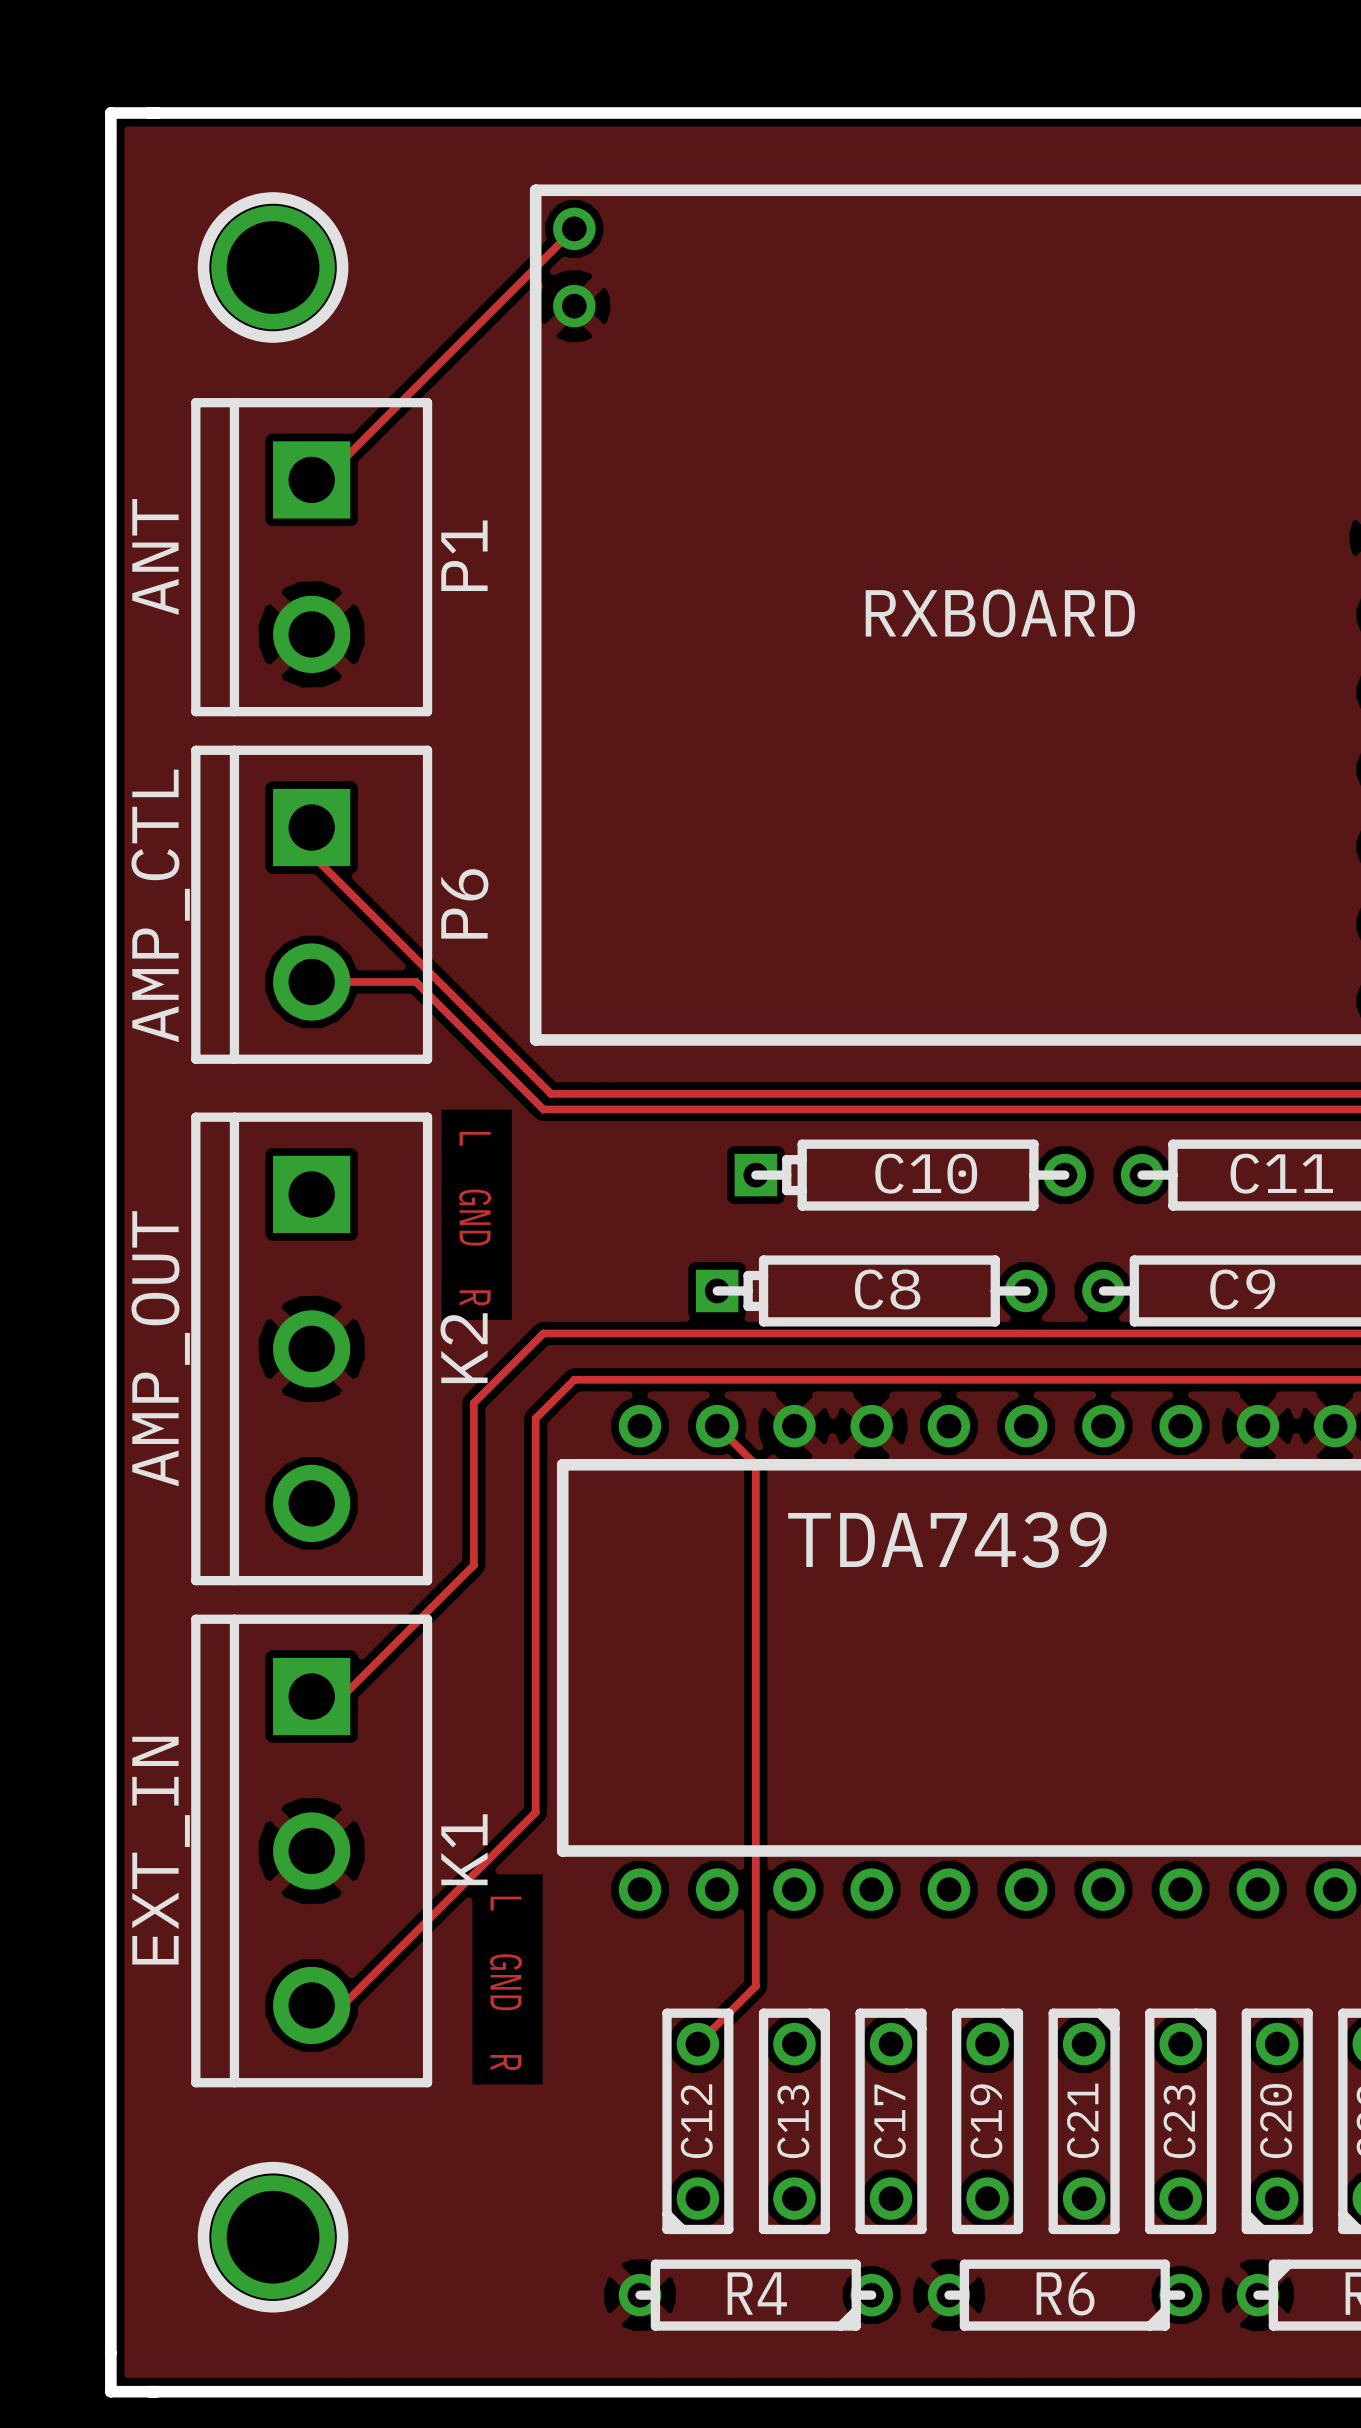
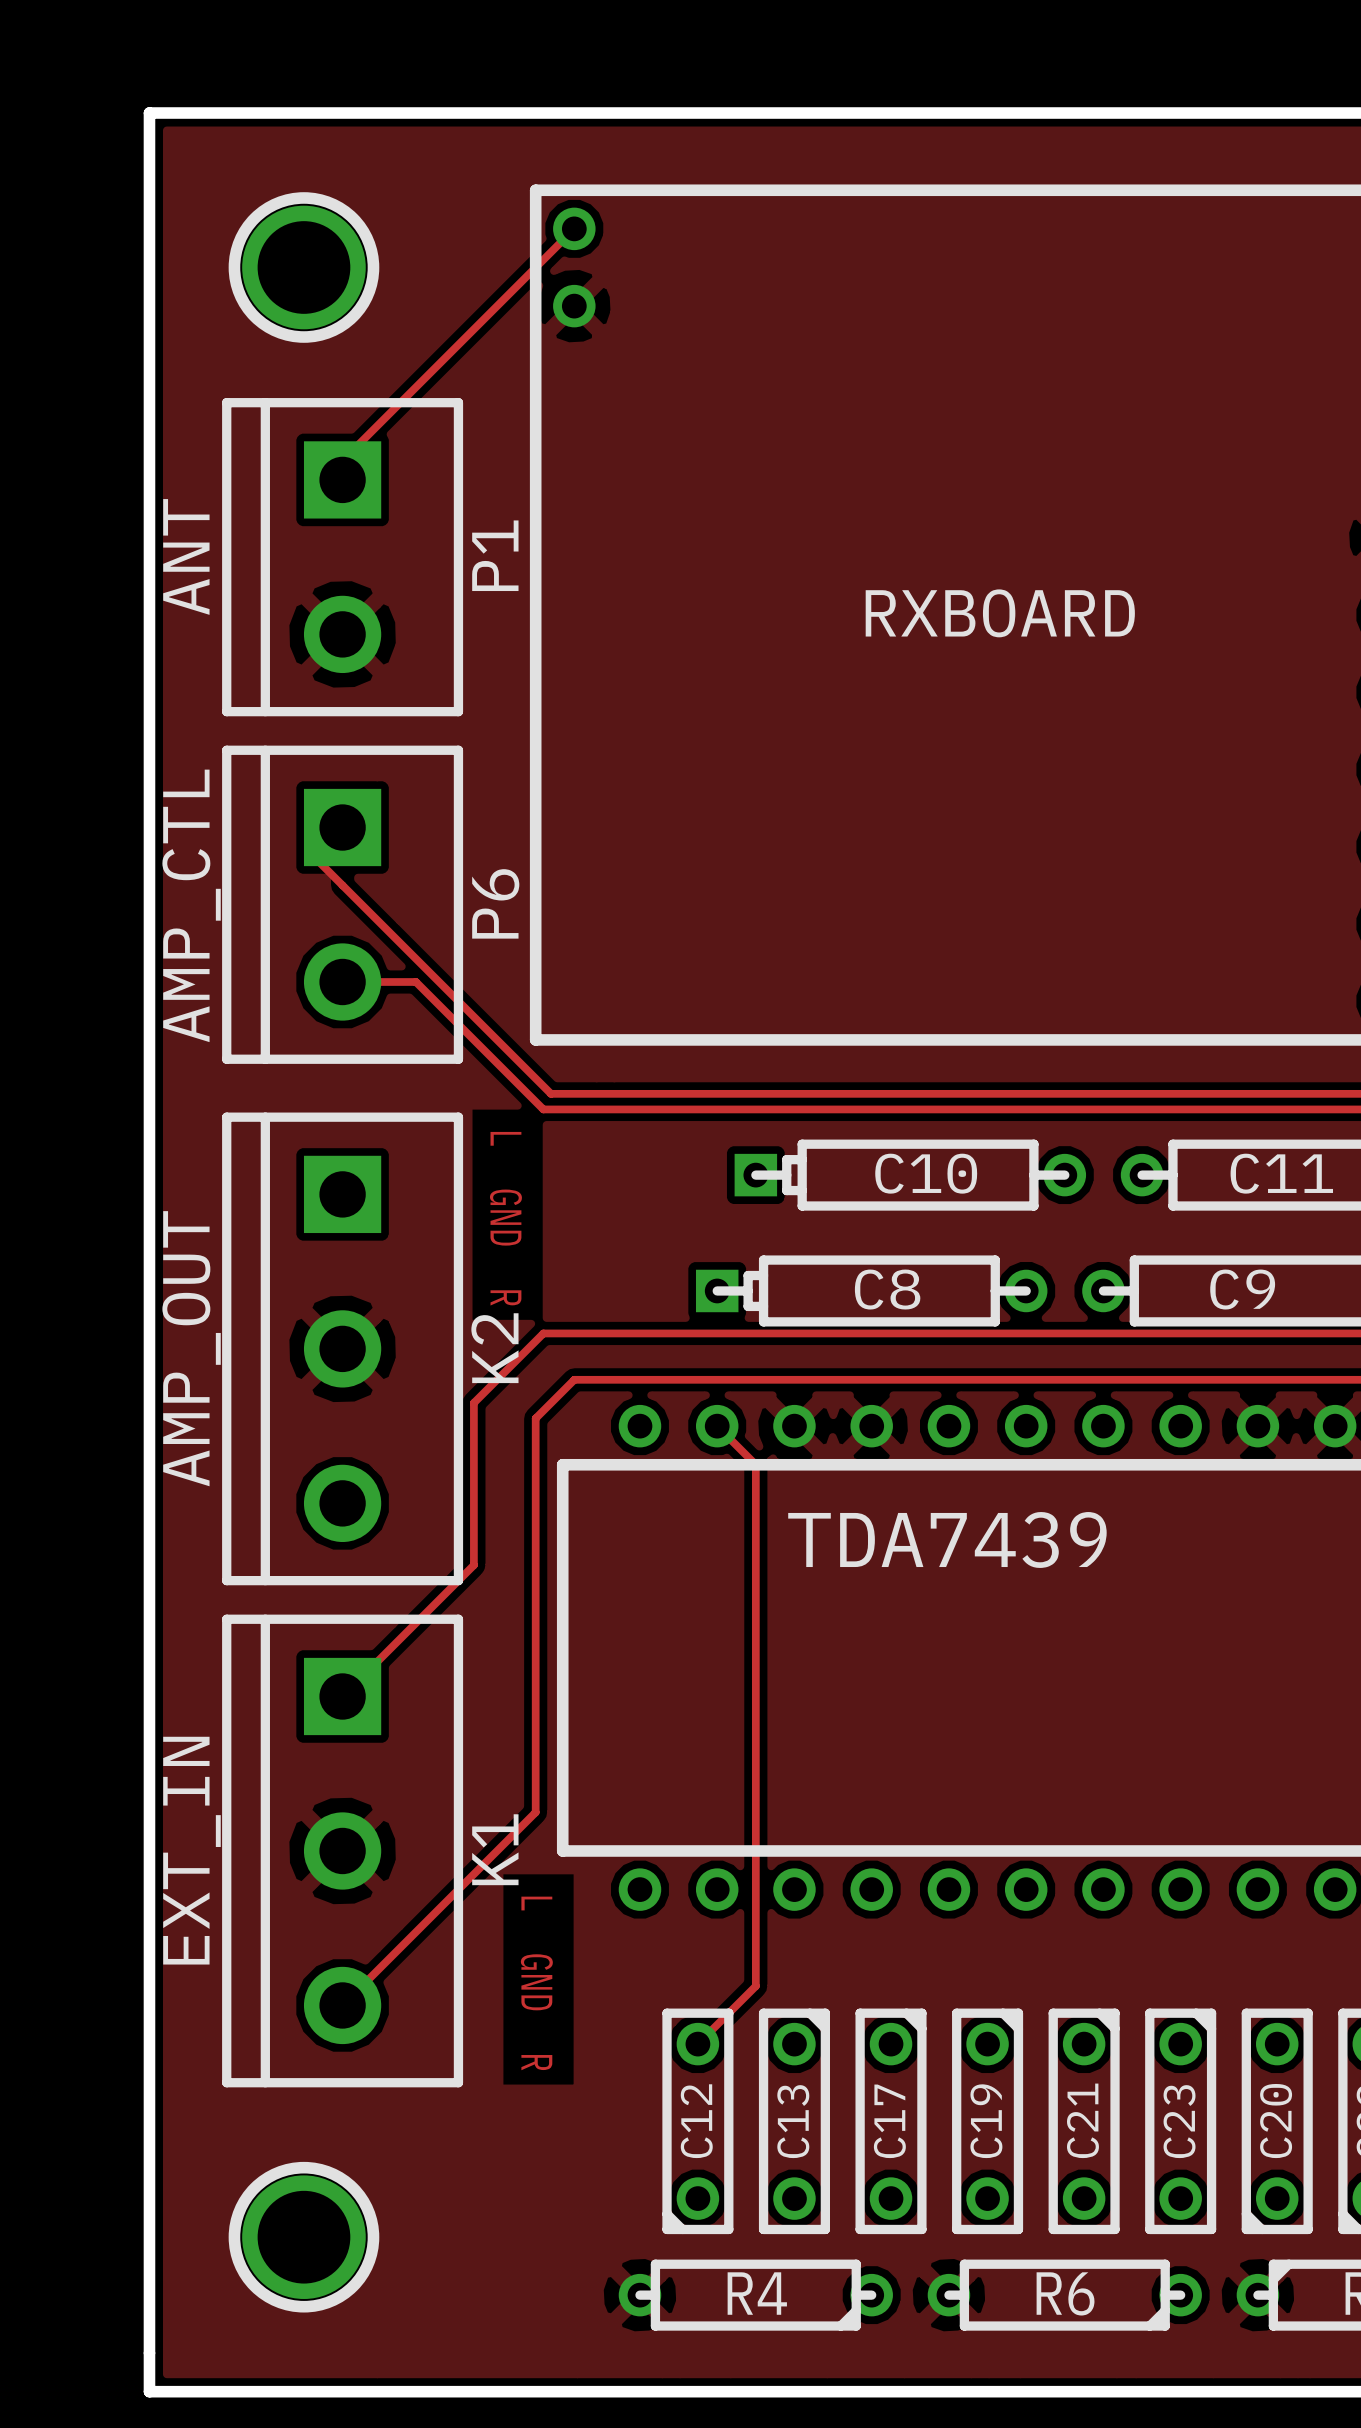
board edge: (149, 113) (110, 113) (110, 2391) (149, 2391) -> (149, 113) (149, 2391)
part position: (273, 267) -> (303, 267)
P1 position: (311, 557) -> (342, 557)
P6 position: (311, 904) -> (342, 904)
text position: L GND R (475, 1218) -> L GND R (505, 1218)
K2 position: (311, 1348) -> (342, 1348)
K1 position: (311, 1850) -> (342, 1850)
text position: L GND R (505, 1983) -> L GND R (536, 1983)
part position: (273, 2237) -> (303, 2237)

